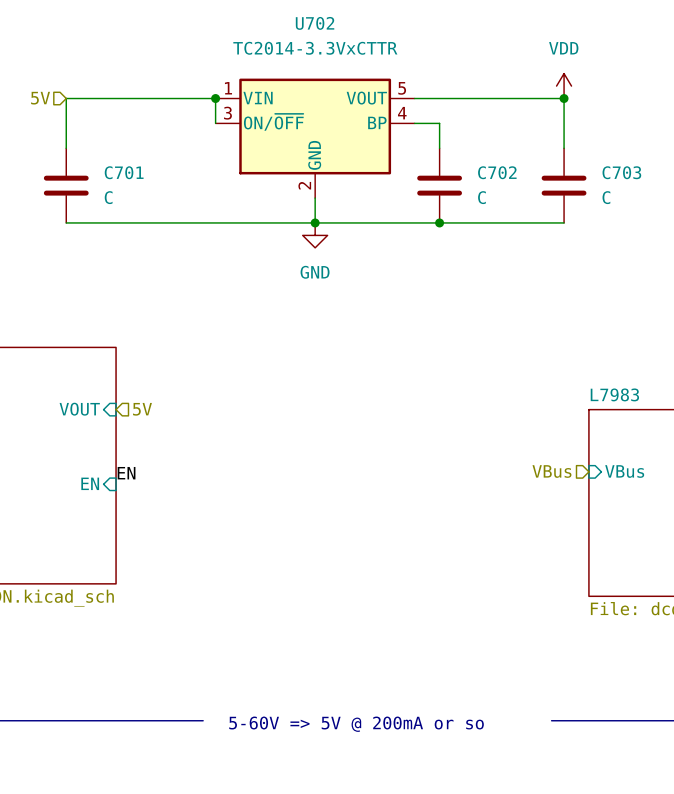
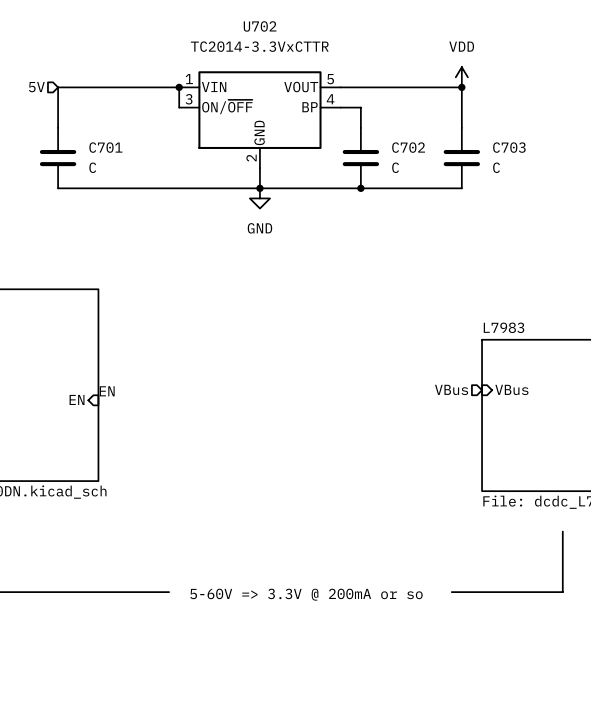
sheet pin: VOUT (79, 409) -> none
hierarchical label: 5V (142, 409) -> none
text: 5-60V => 5V @ 200mA or so (356, 724) -> 5-60V => 3.3V @ 200mA or so (306, 594)

